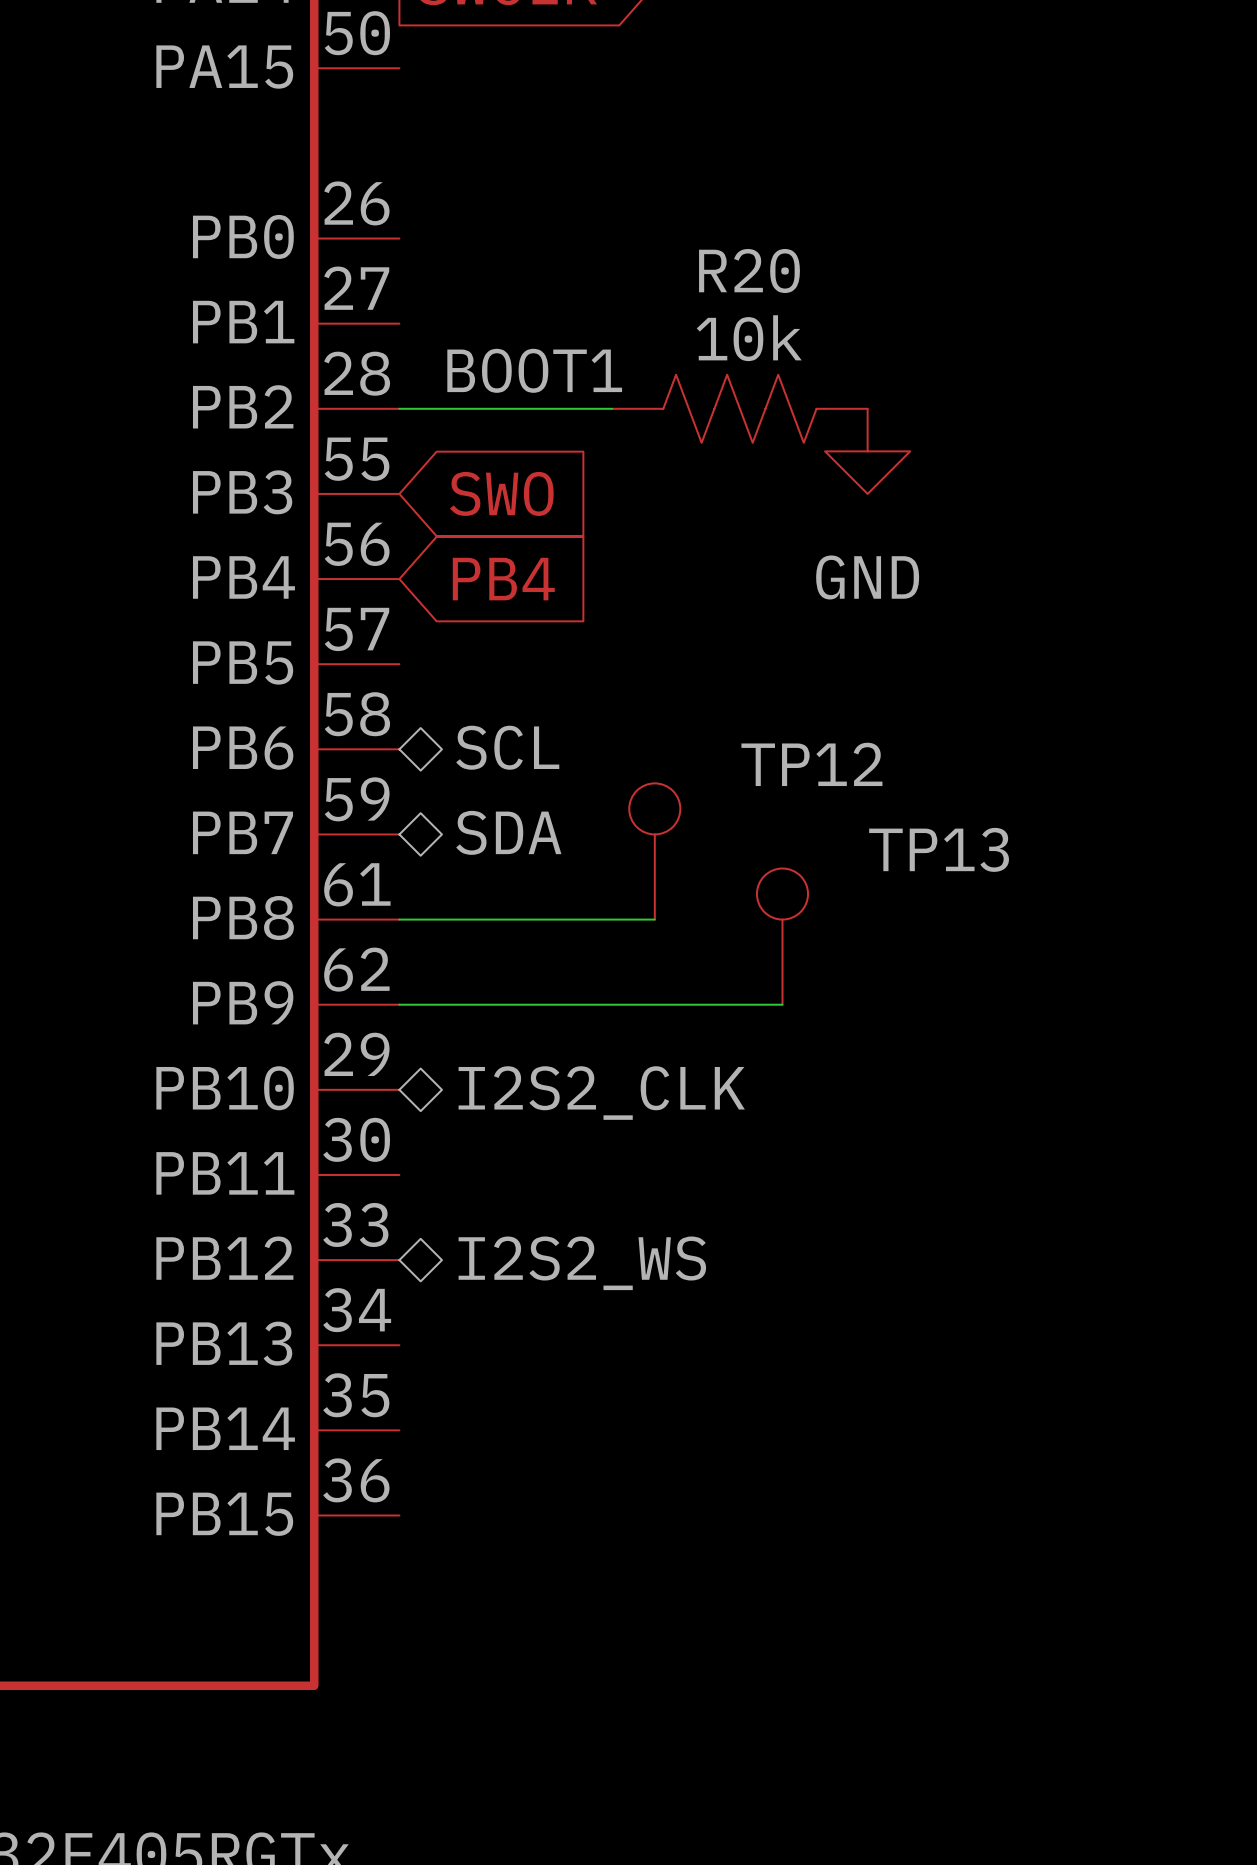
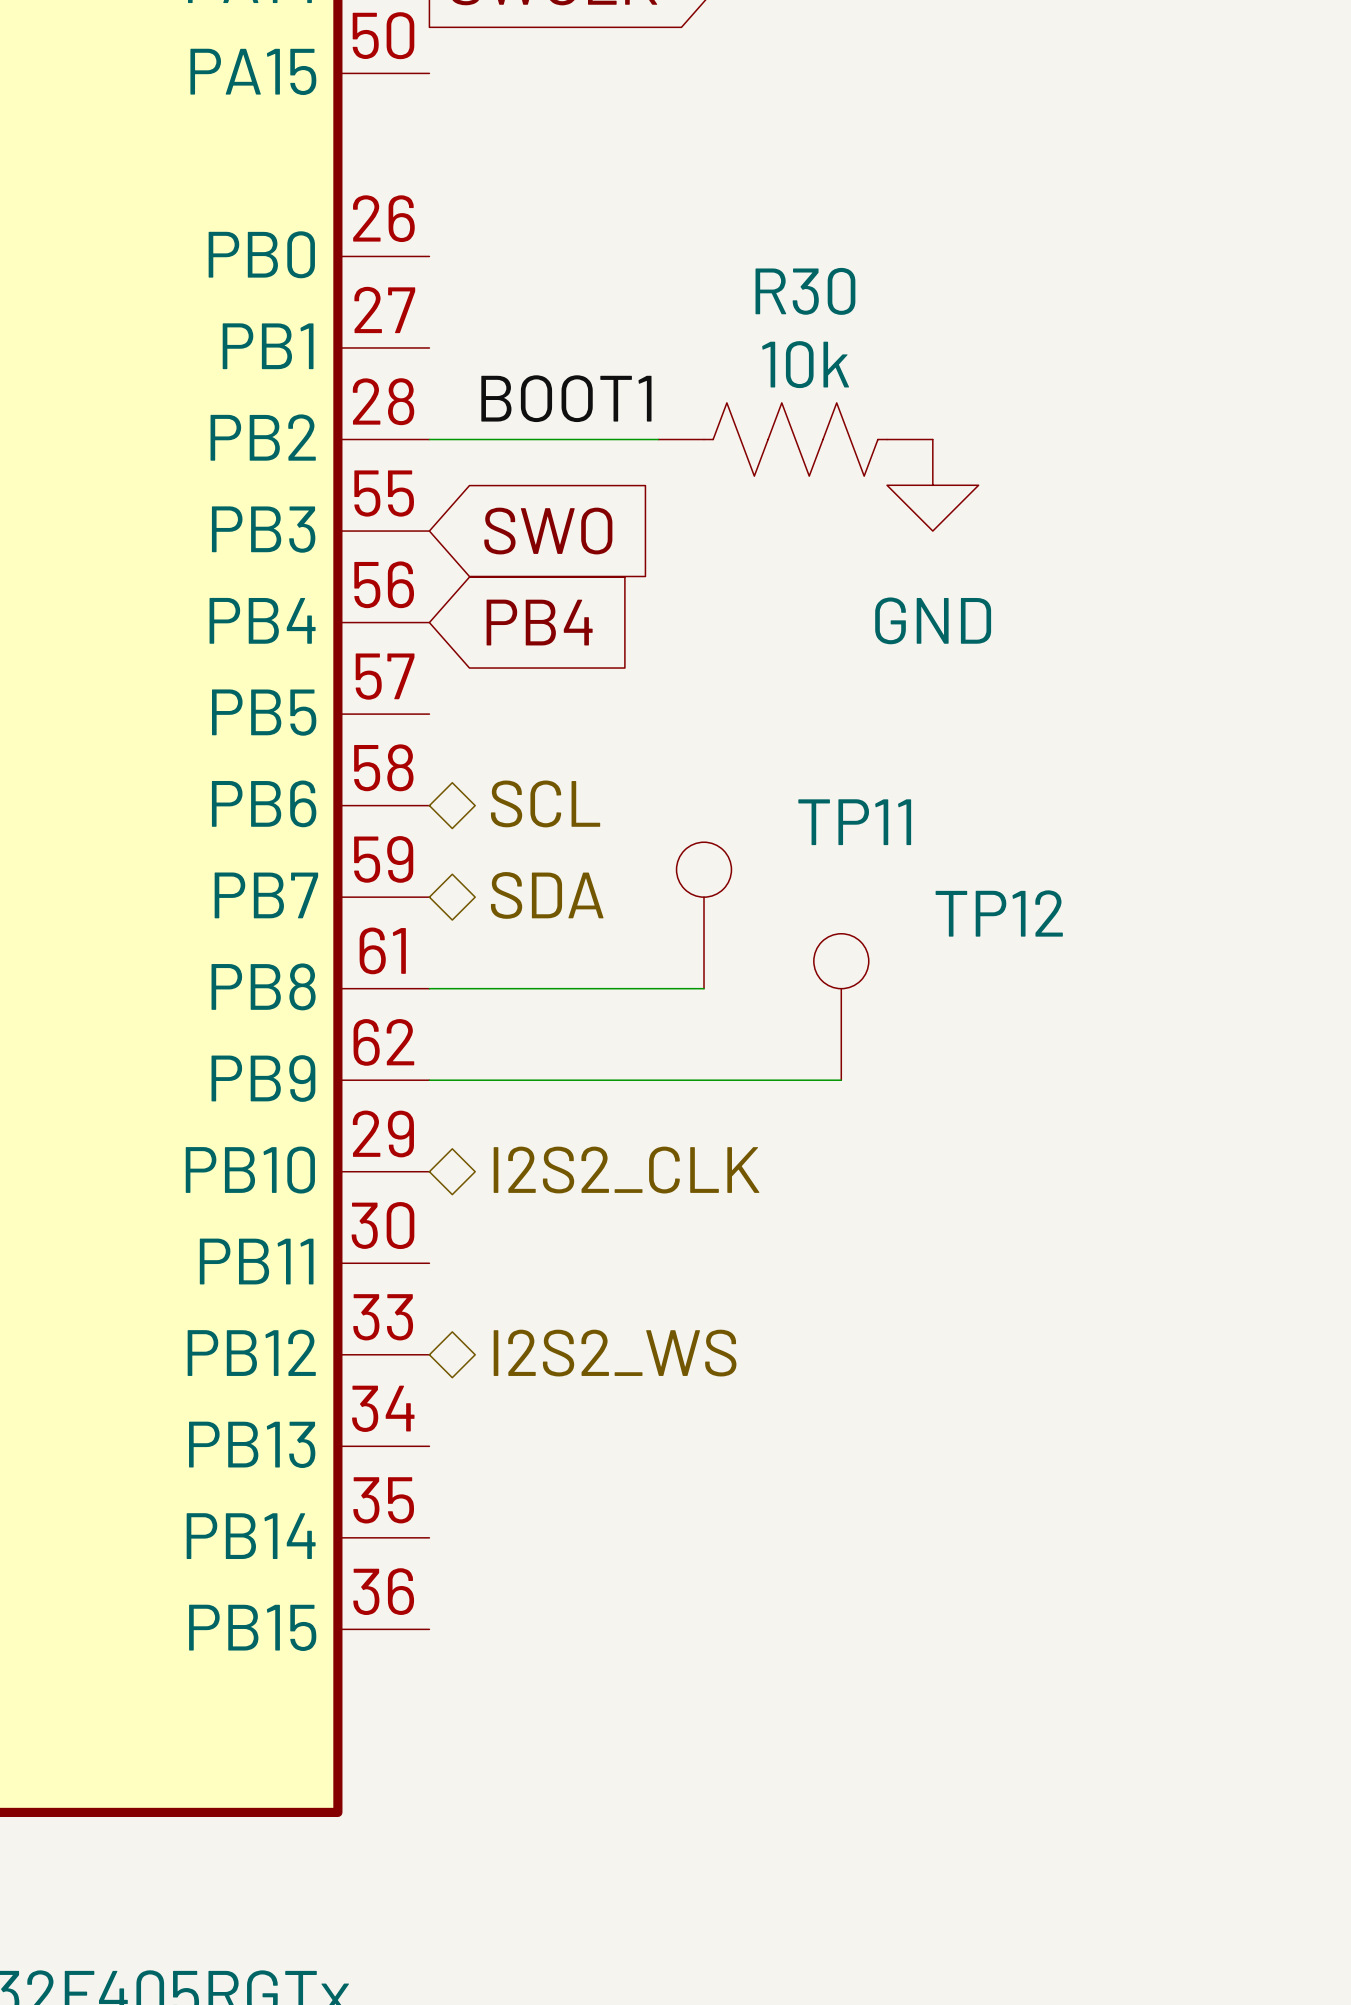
R20 name: R20 (749, 271) -> R30 (805, 291)
TP12 name: TP12 (811, 764) -> TP11 (854, 822)
TP13 name: TP13 (939, 849) -> TP12 (999, 913)

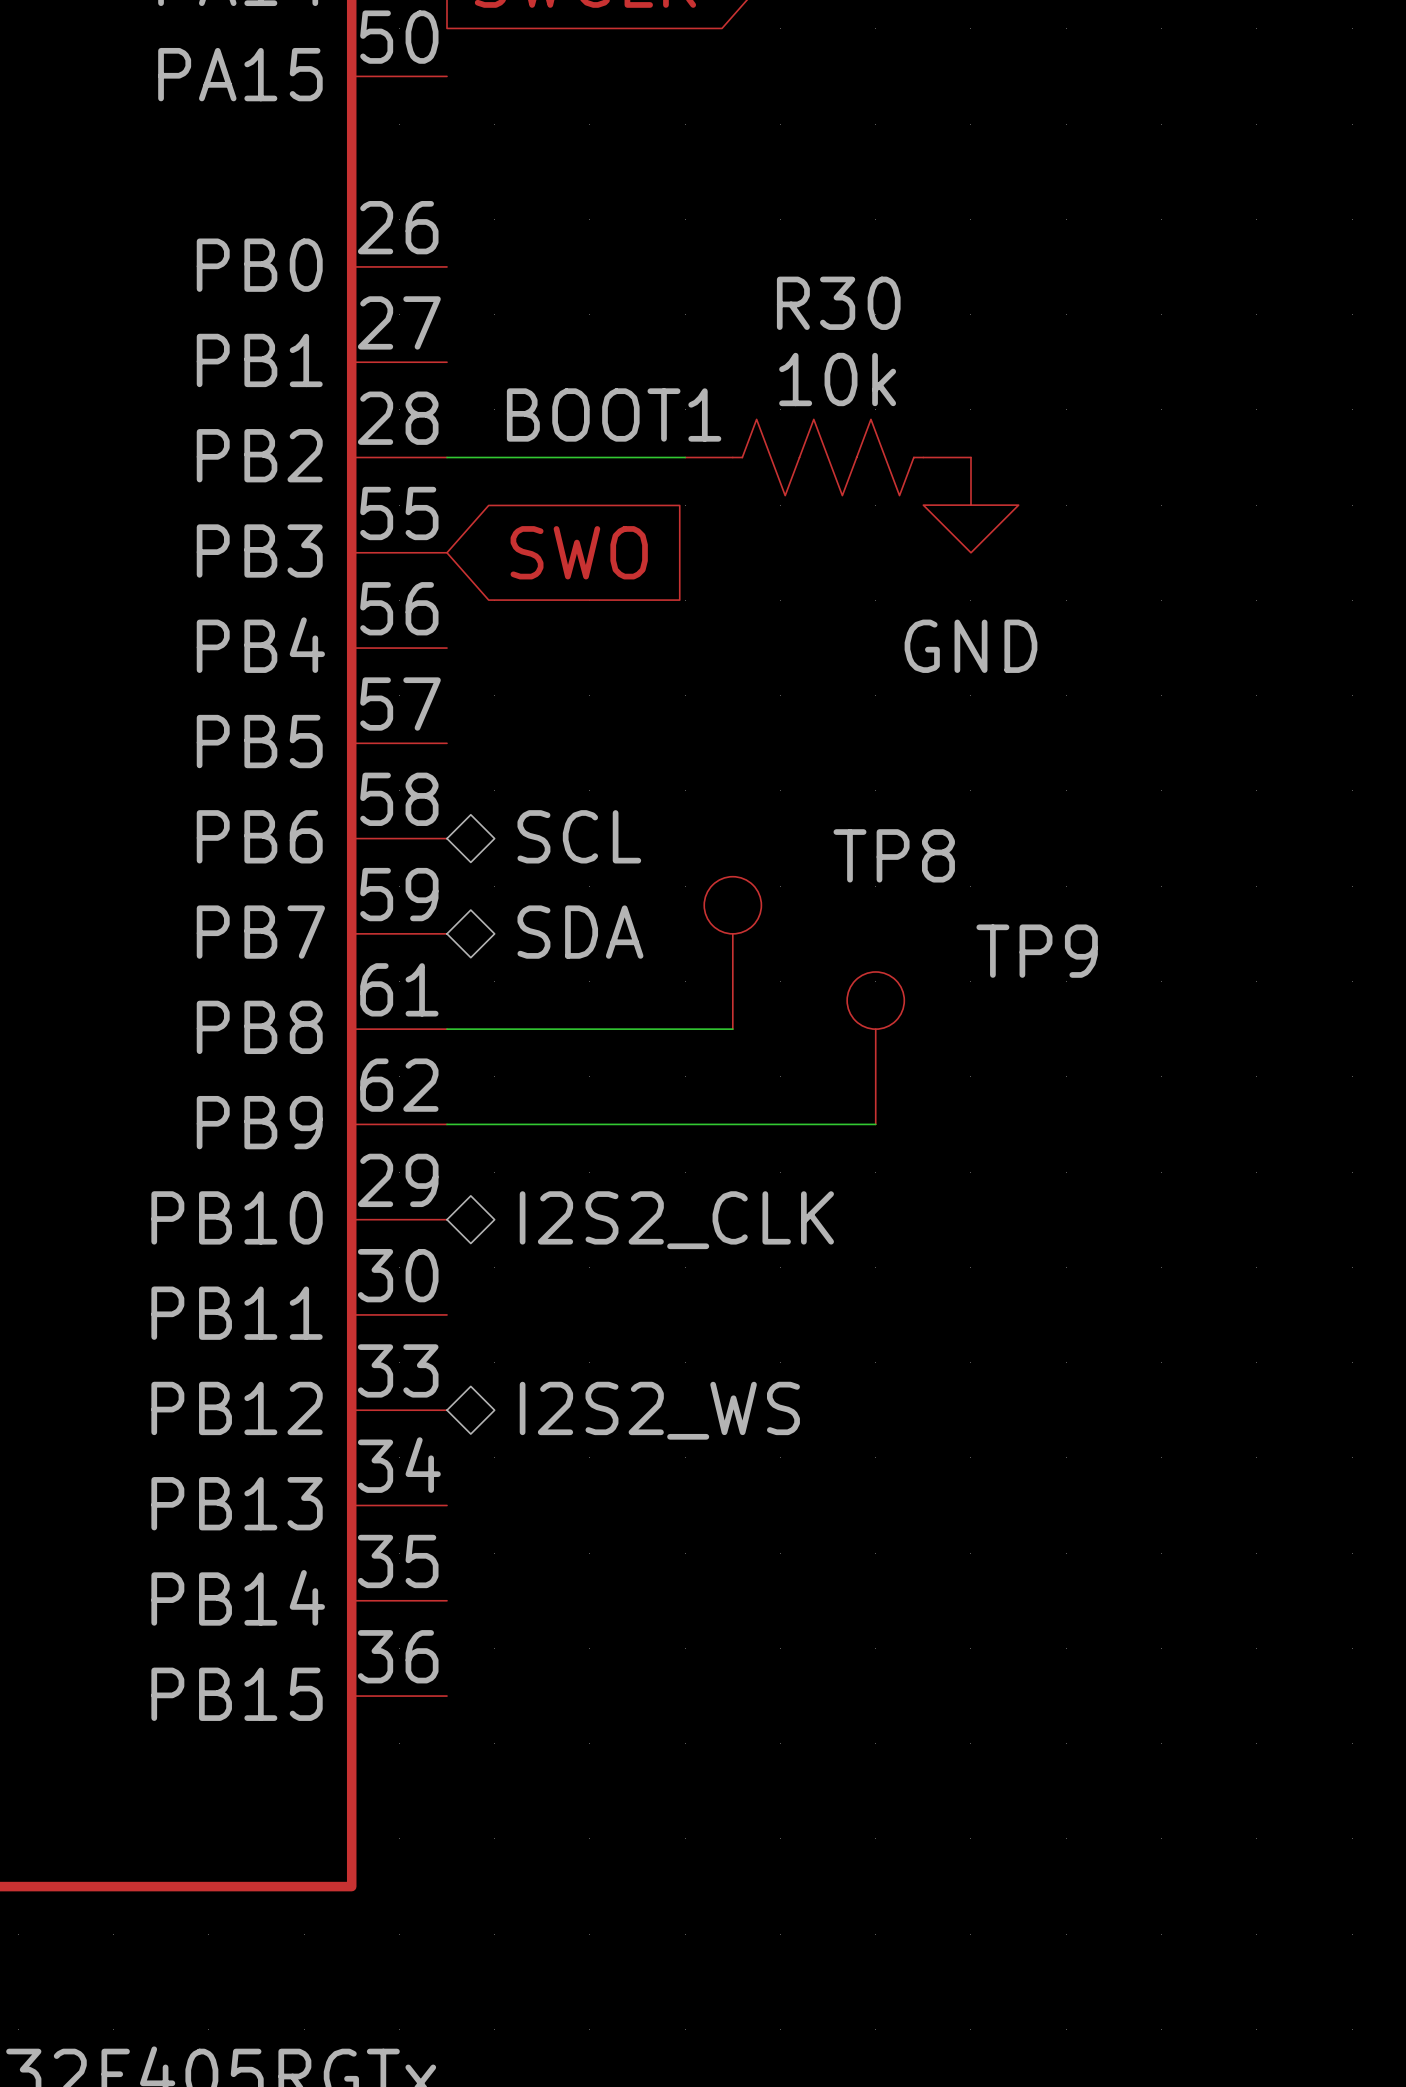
global label: PB4 (539, 622) -> none
TP11 name: TP11 (854, 822) -> TP8 (894, 855)
TP12 name: TP12 (999, 913) -> TP9 (1037, 951)

